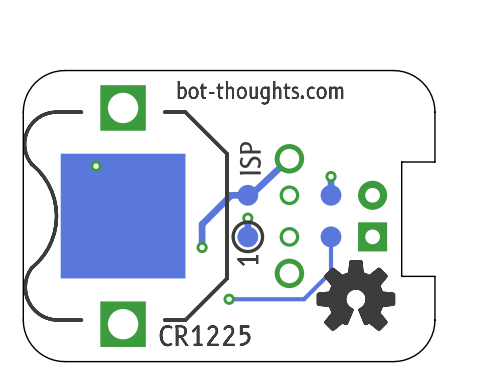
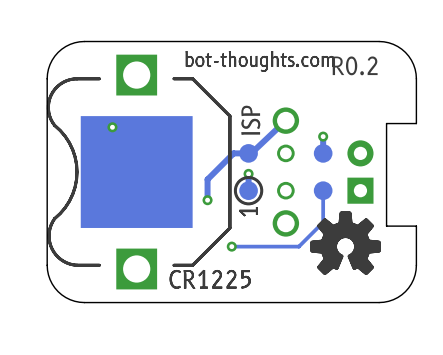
text: none -> R0.2 (354, 65)

